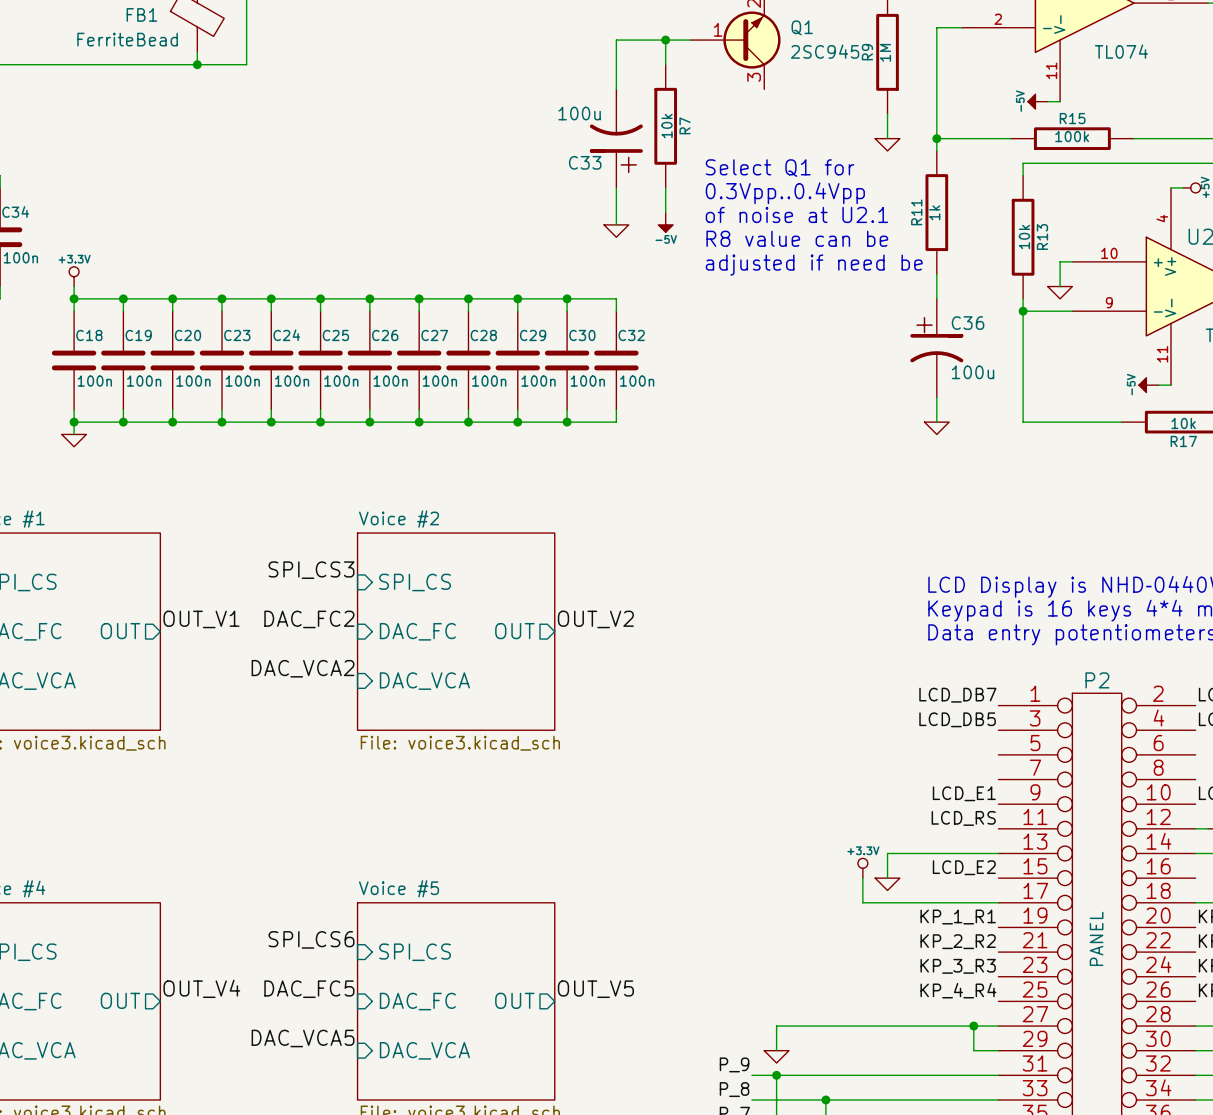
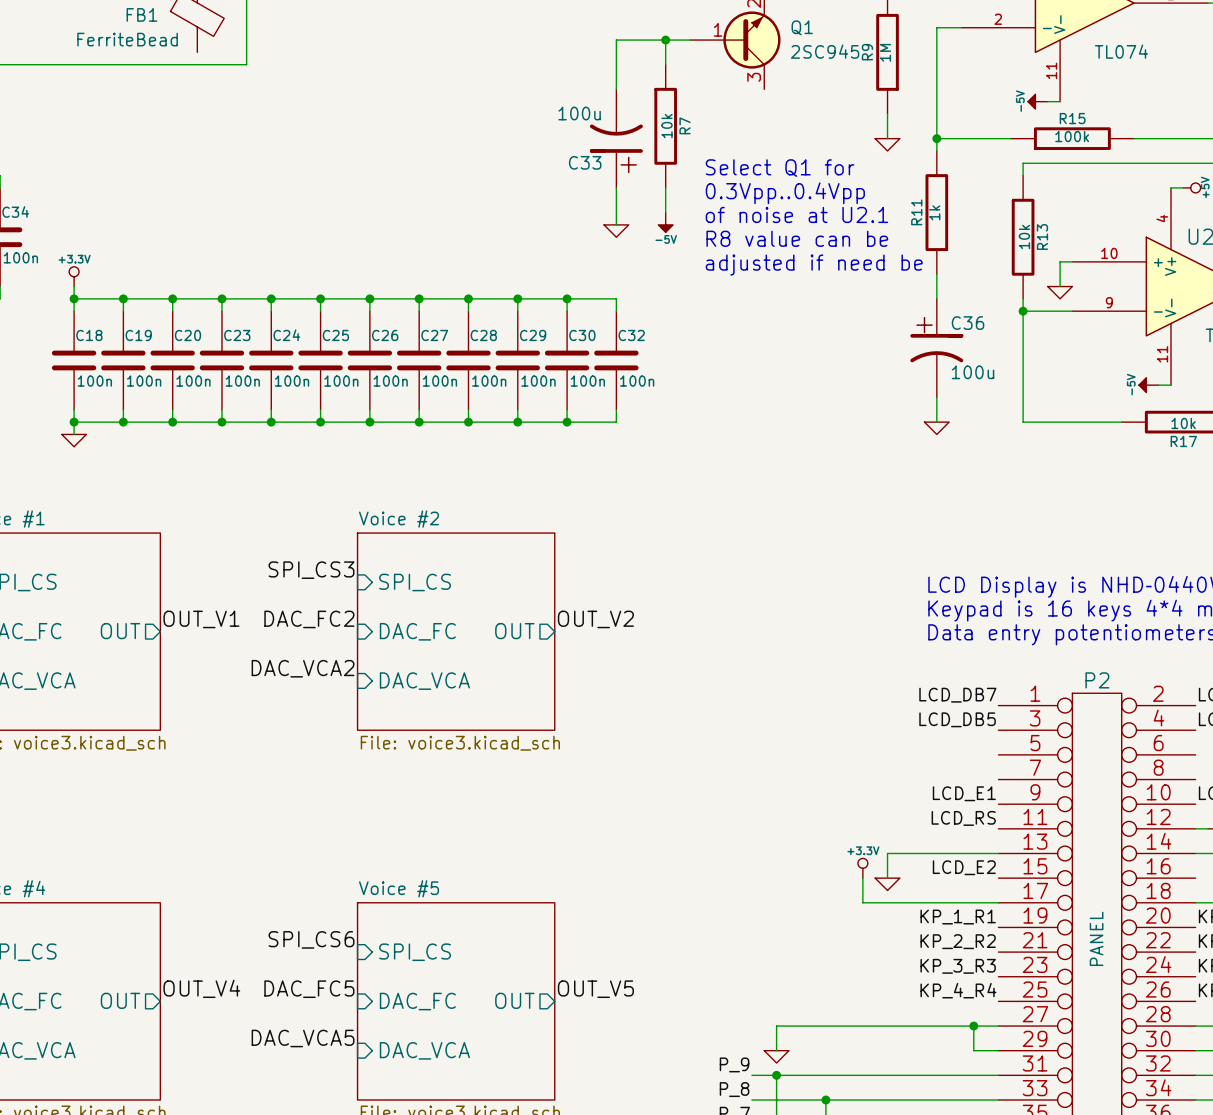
wire: (197, 52) (197, 64) -> none
junction: (197, 64) -> none

